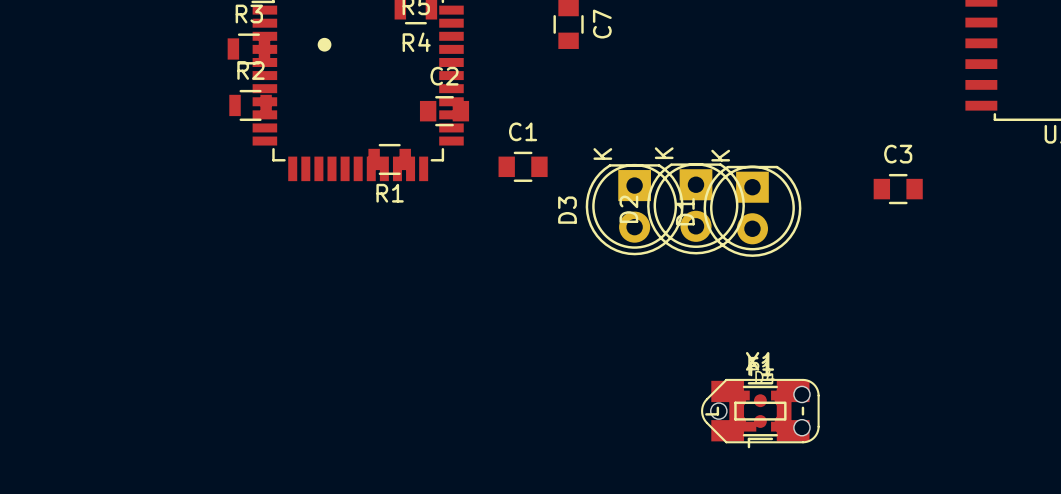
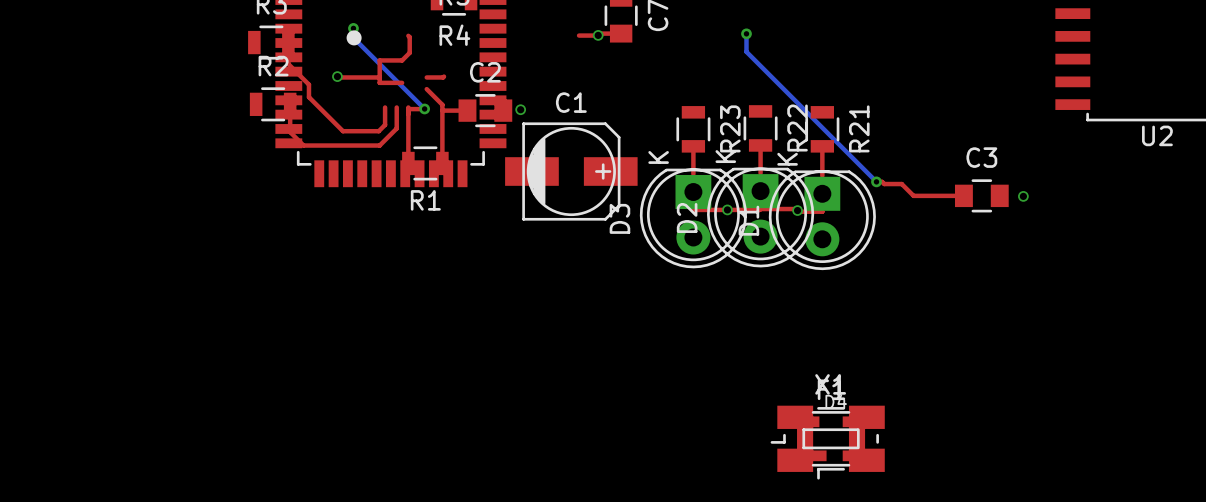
bottom track: none -> (353, 28) (353, 37) (424, 108)
via: none -> (353, 28)
top track: none -> (621, 33) (579, 35)
bottom track: none -> (746, 33) (746, 51) (876, 181)
via: none -> (746, 33)
top track: none -> (408, 35) (409, 52) (402, 60) (379, 60) (379, 82) (402, 82)
via: none -> (598, 35)
top track: none -> (288, 42) (288, 64) (308, 84) (308, 97) (343, 131) (378, 131) (385, 124) (385, 107)
top track: none -> (337, 76) (379, 77)
via: none -> (337, 76)
top track: none -> (444, 76) (426, 77)
top track: none -> (426, 89) (442, 104) (442, 163)
top track: none -> (290, 104) (290, 132) (303, 145) (379, 145) (396, 128) (396, 107)
top track: none -> (408, 107) (408, 163)
top track: none -> (408, 109) (424, 109)
via: none -> (424, 108)
via: none -> (520, 109)
top track: none -> (442, 110) (467, 110)
R22: none -> (760, 128)
R23: none -> (693, 129)
R21: none -> (822, 129)
top track: none -> (693, 146) (693, 174)
top track: none -> (760, 145) (760, 173)
top track: none -> (822, 146) (822, 175)
C1 footprint: [498, 151, 548, 182] -> [505, 122, 638, 221]
top track: none -> (876, 181) (901, 184) (913, 195) (963, 195)
via: none -> (876, 181)
via: none -> (1023, 196)
via: none -> (727, 209)
top track: none -> (819, 209) (822, 211) (798, 211) (796, 209) (693, 209)
via: none -> (797, 210)
part: (760, 411) -> none

